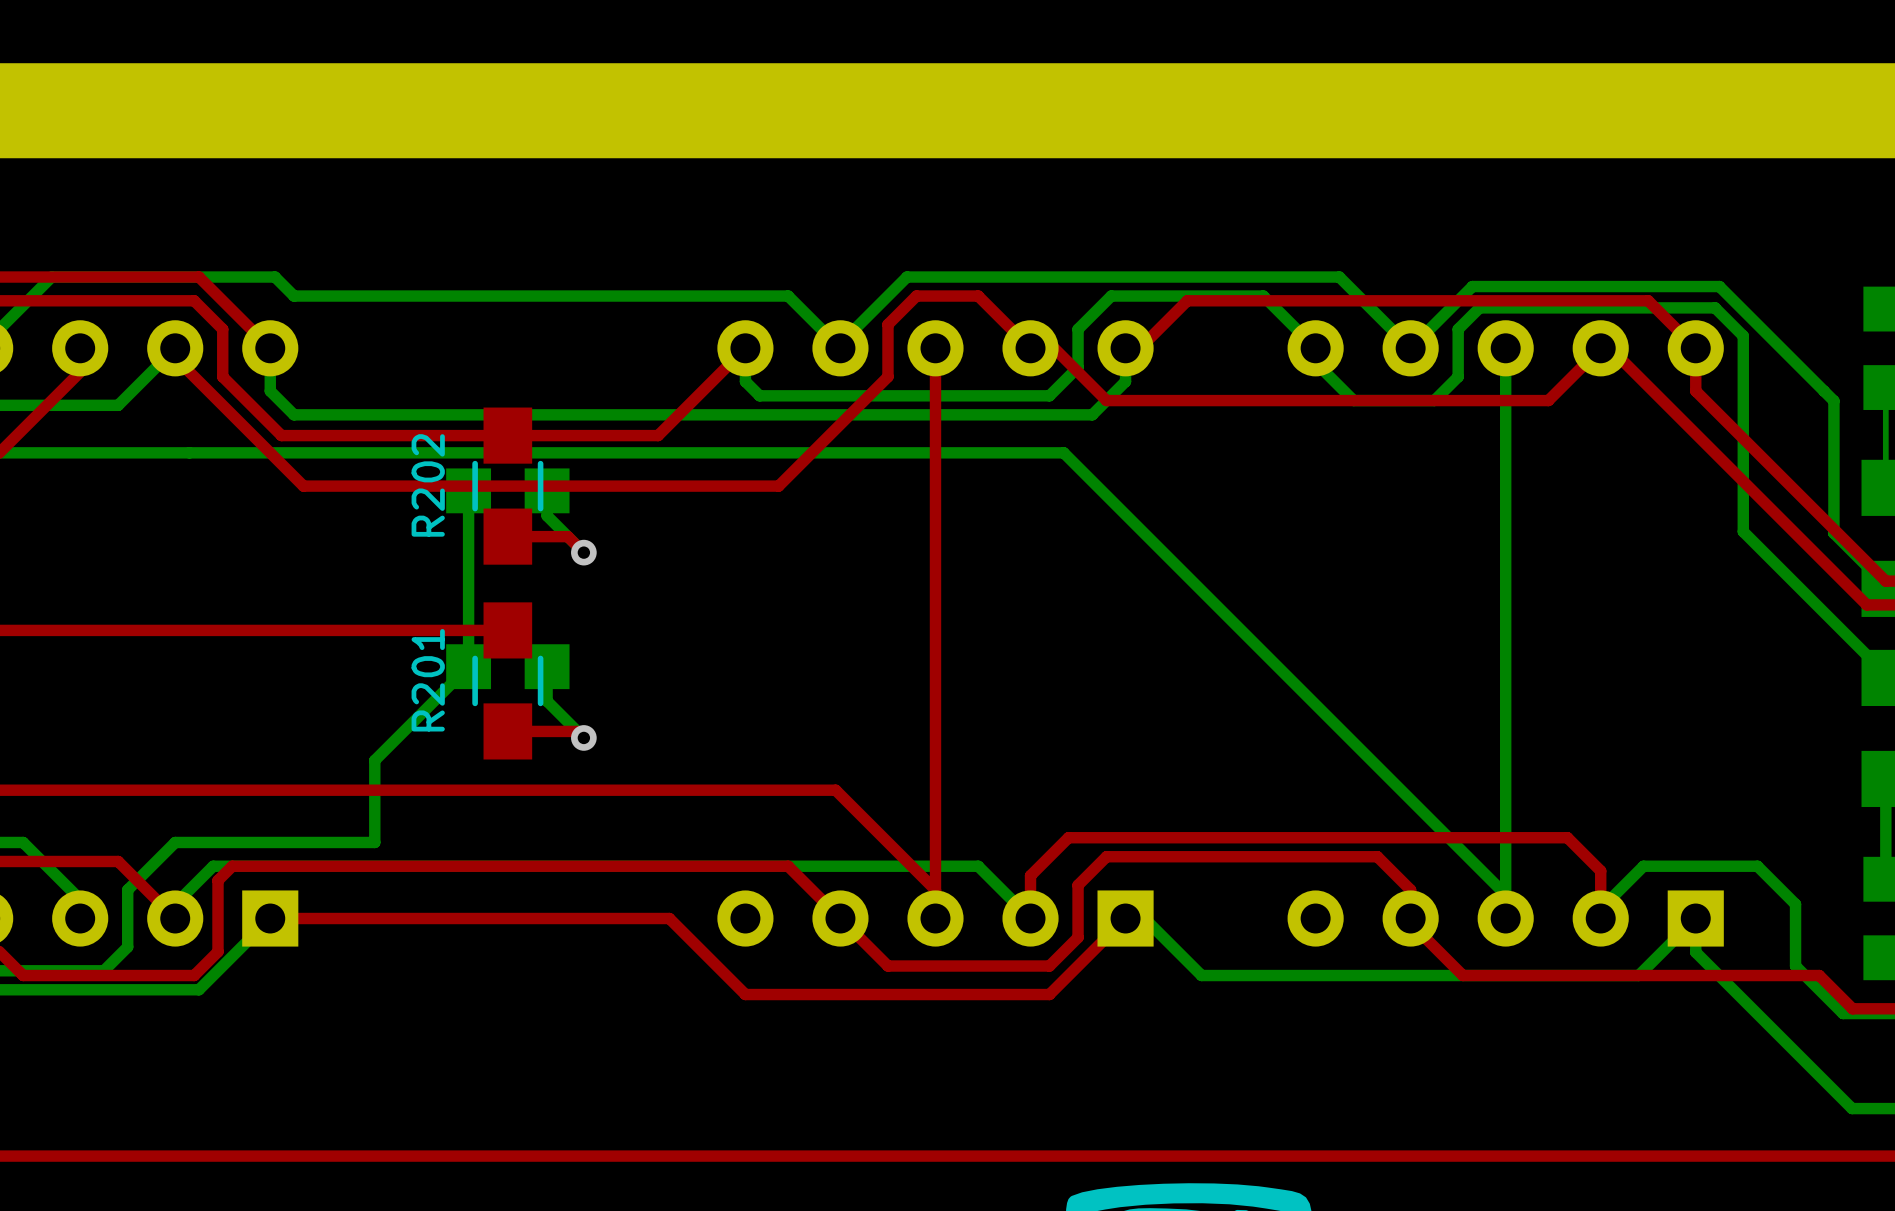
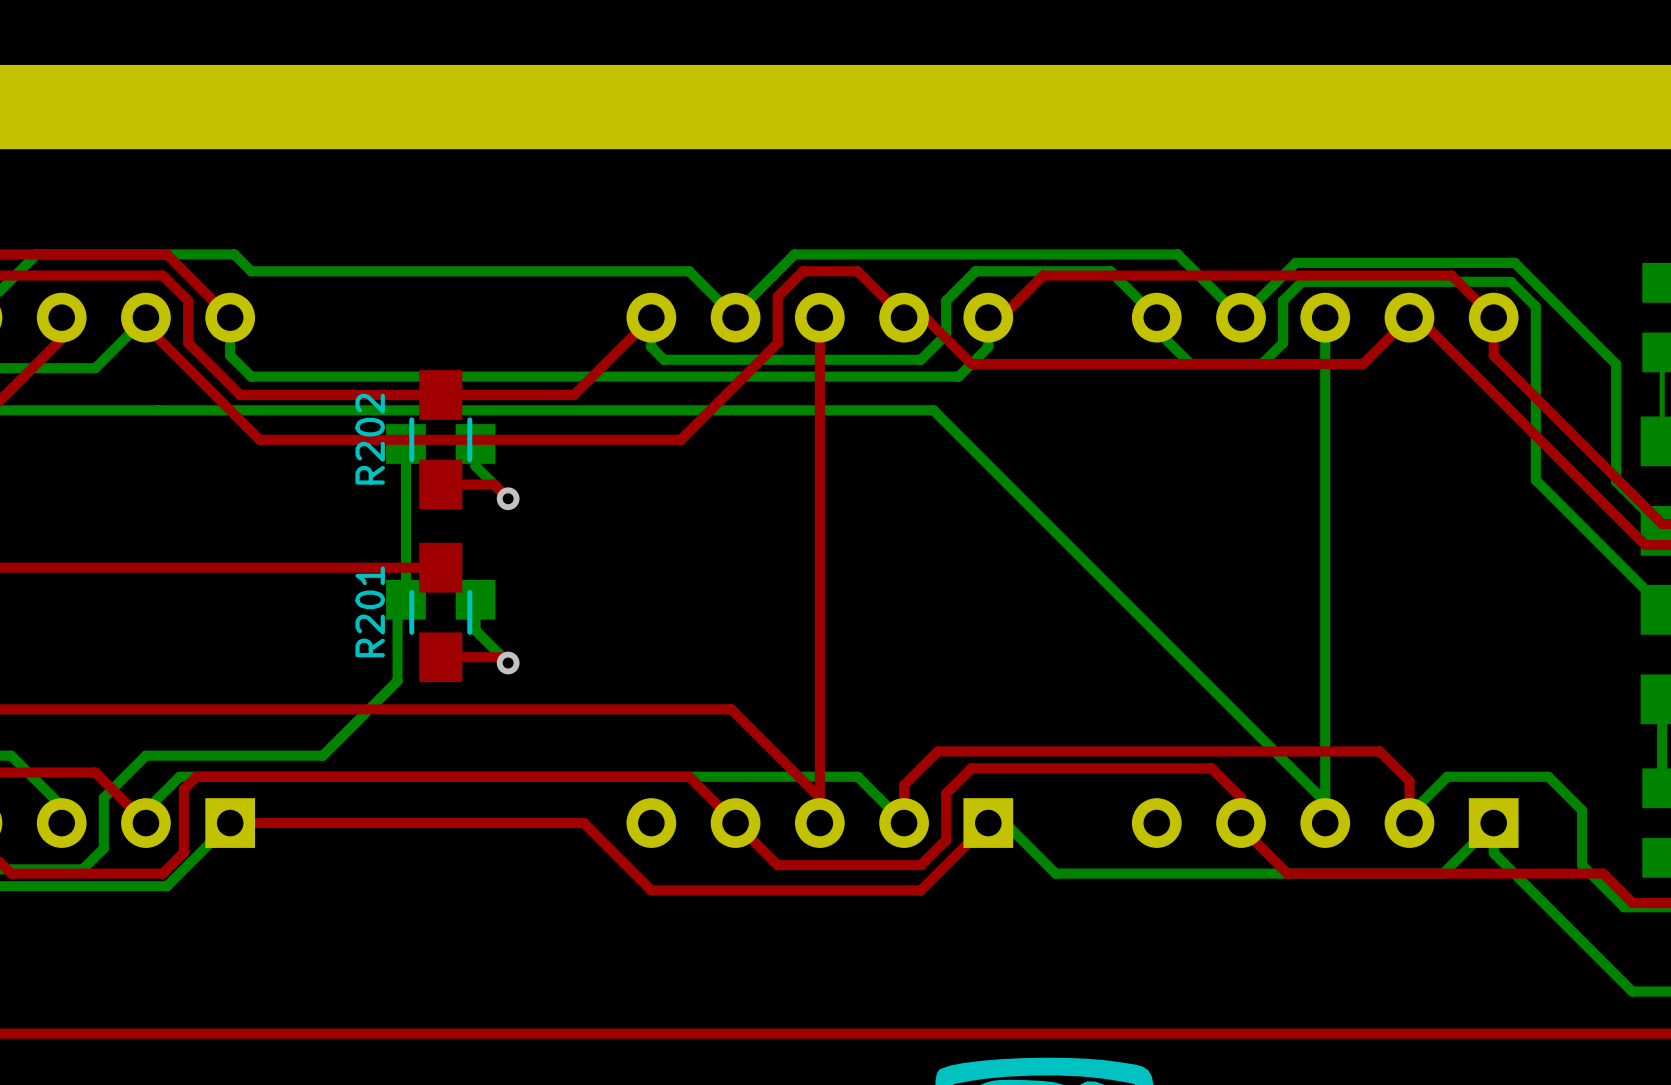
bottom track: (468, 666) (374, 760) (374, 842) -> (405, 591) (397, 599) (397, 680) (322, 755)

